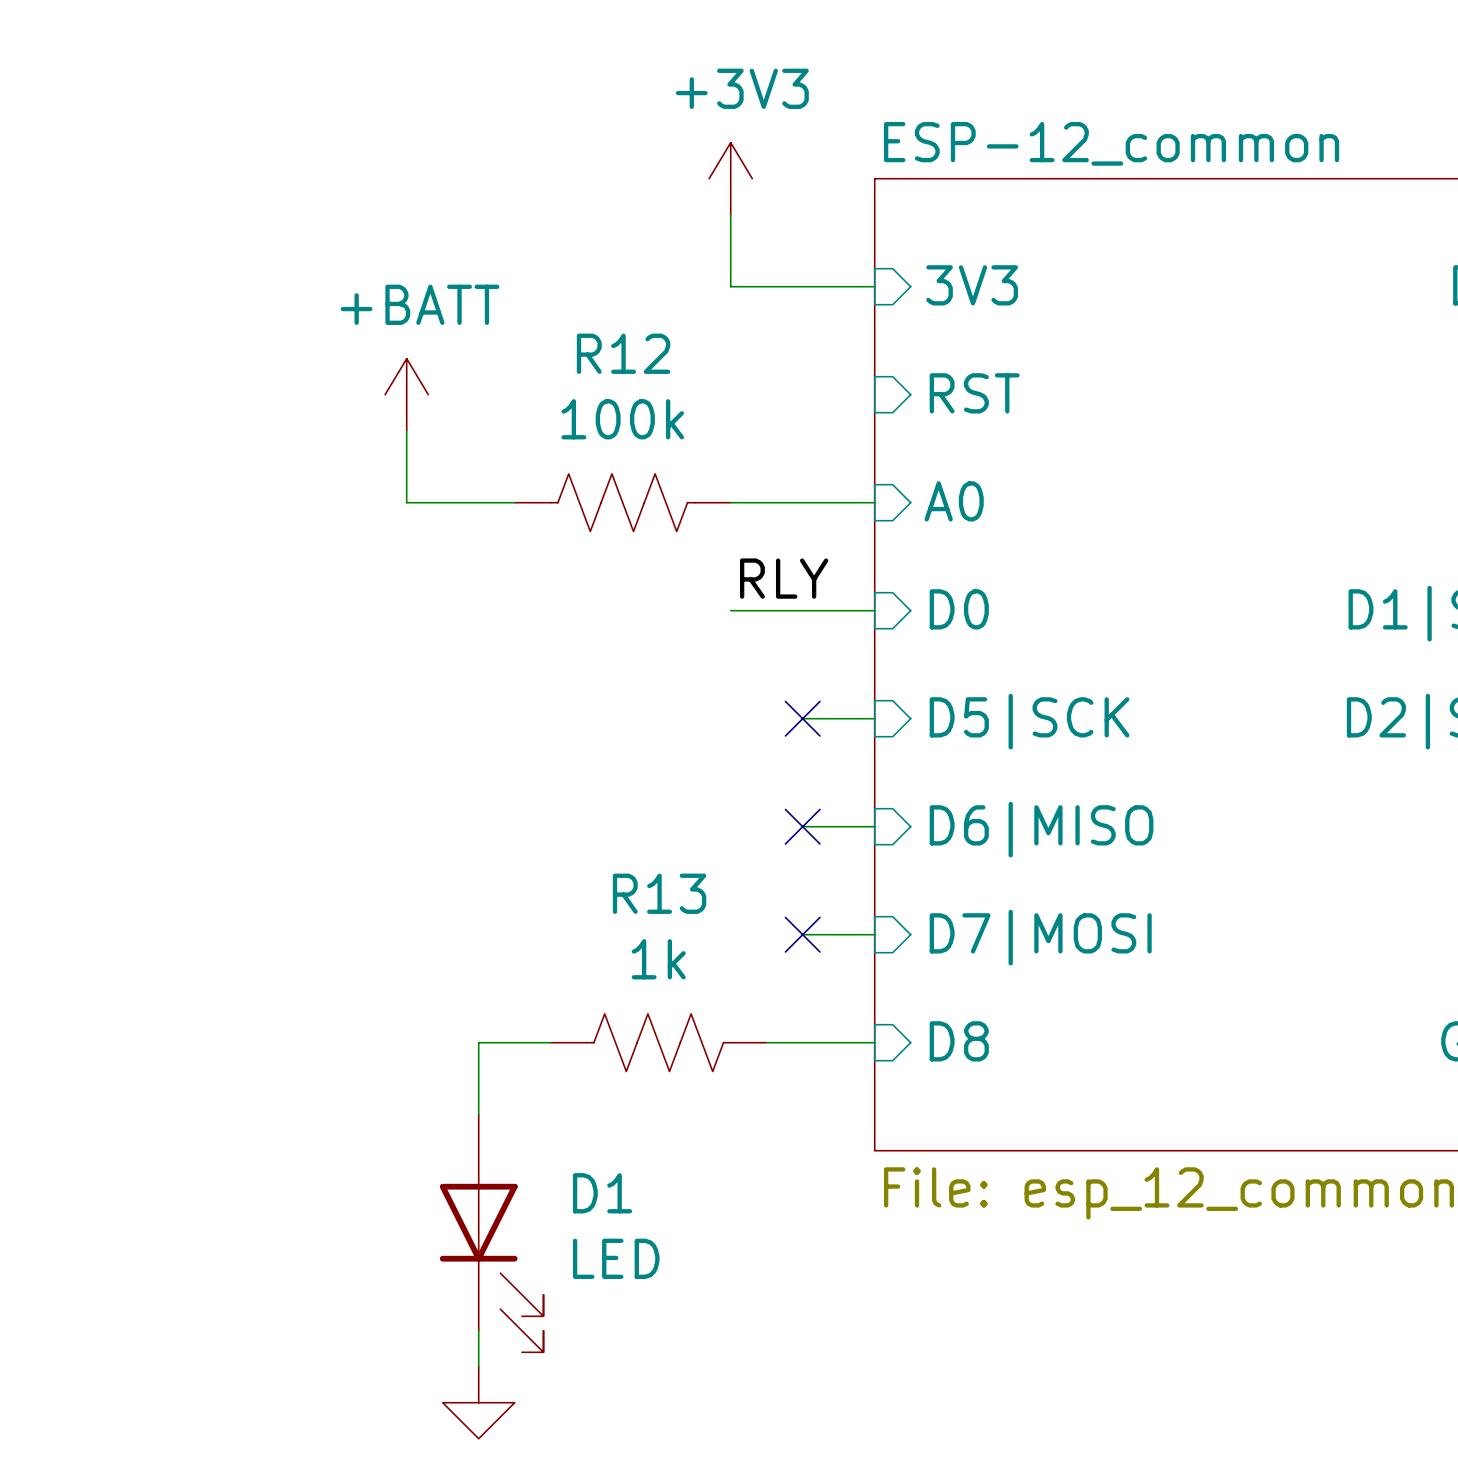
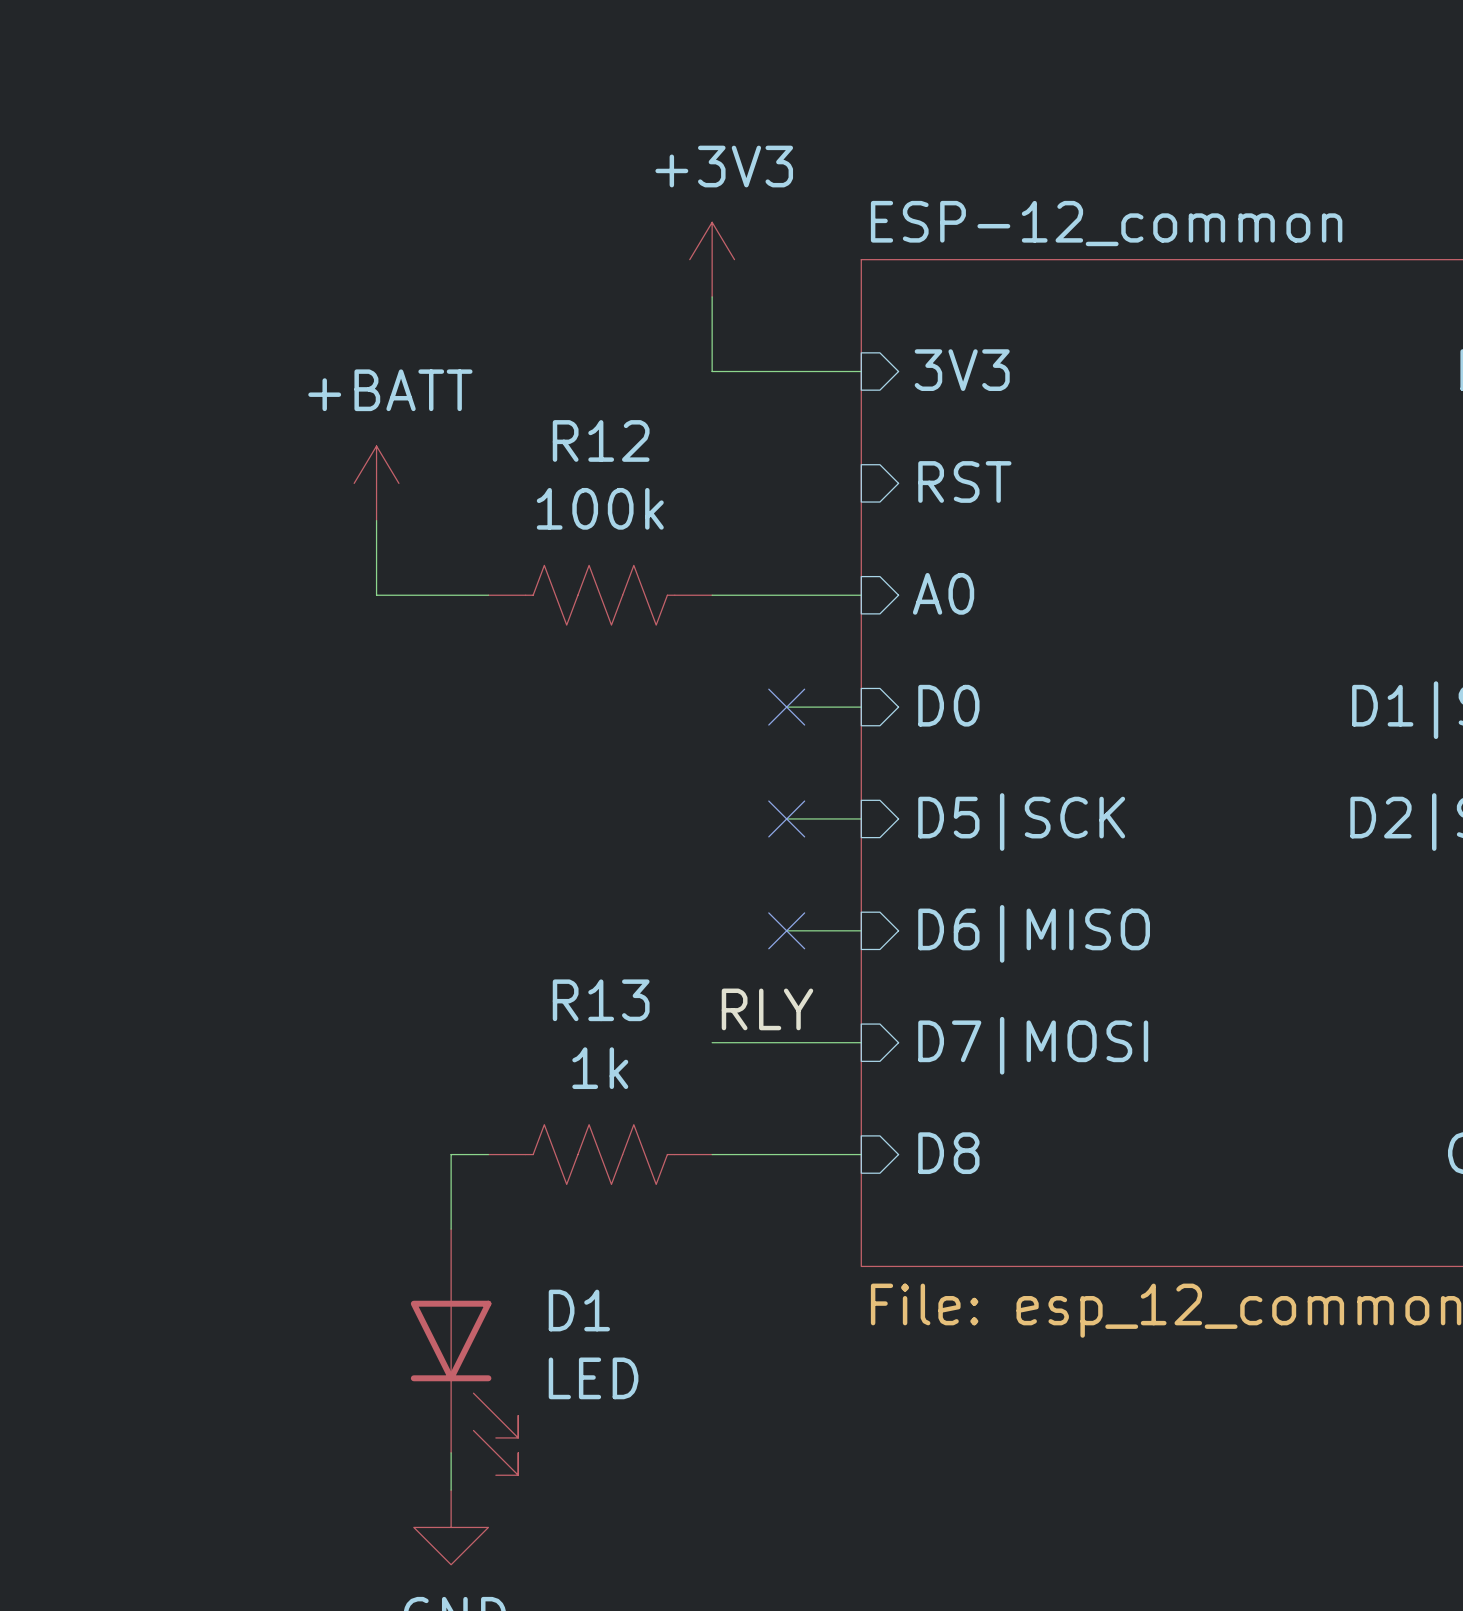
label position: RLY (784, 578) -> RLY (767, 1009)
wire: (730, 610) (802, 610) -> (712, 1042) (786, 1042)
no-connect mark: none -> (786, 707)
no-connect mark: (802, 934) -> none
R13 position: (658, 1042) -> (600, 1154)

